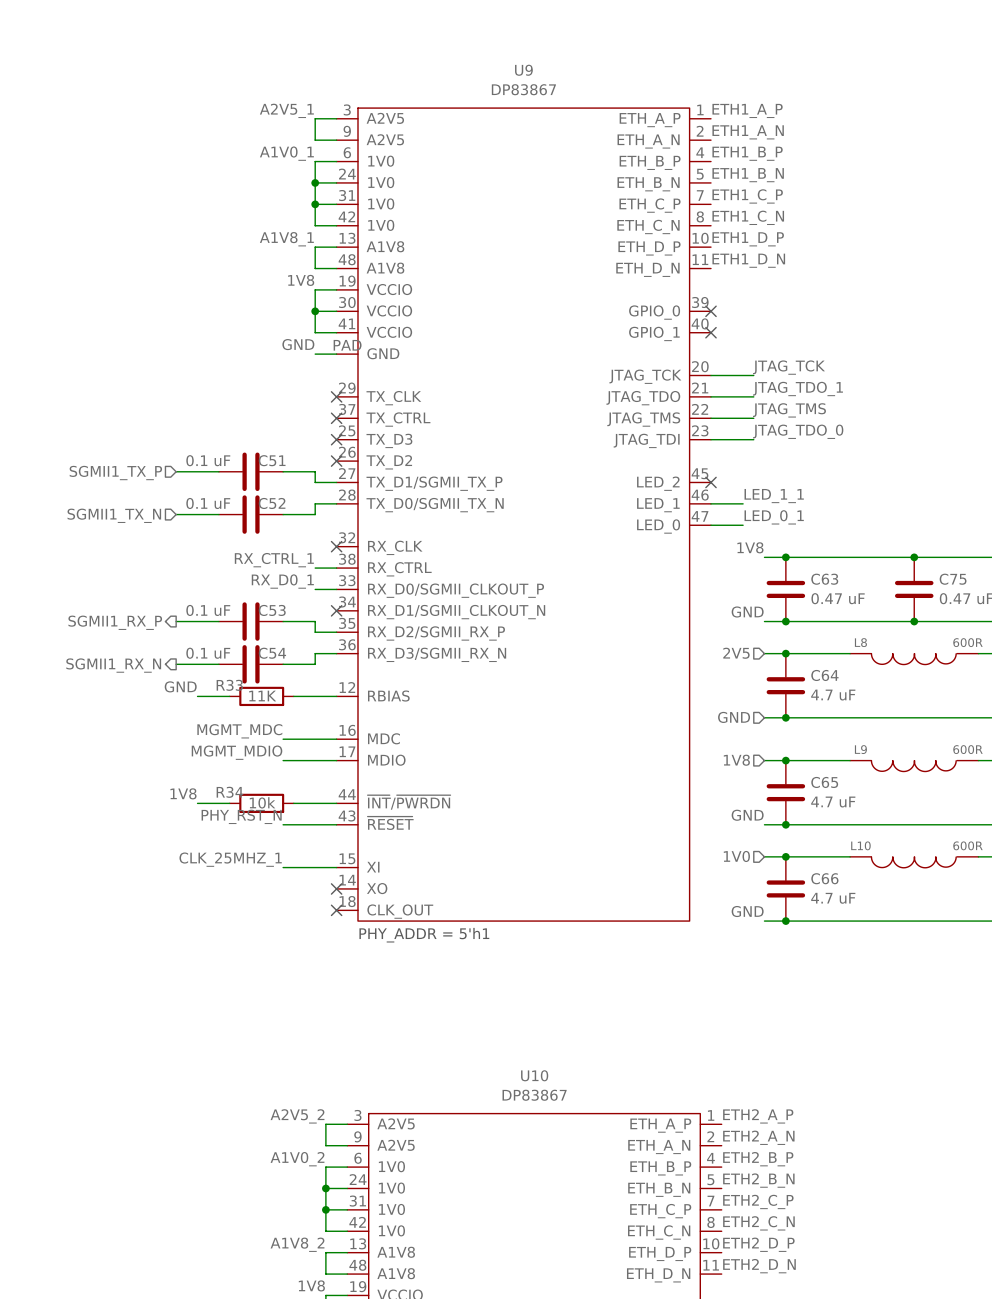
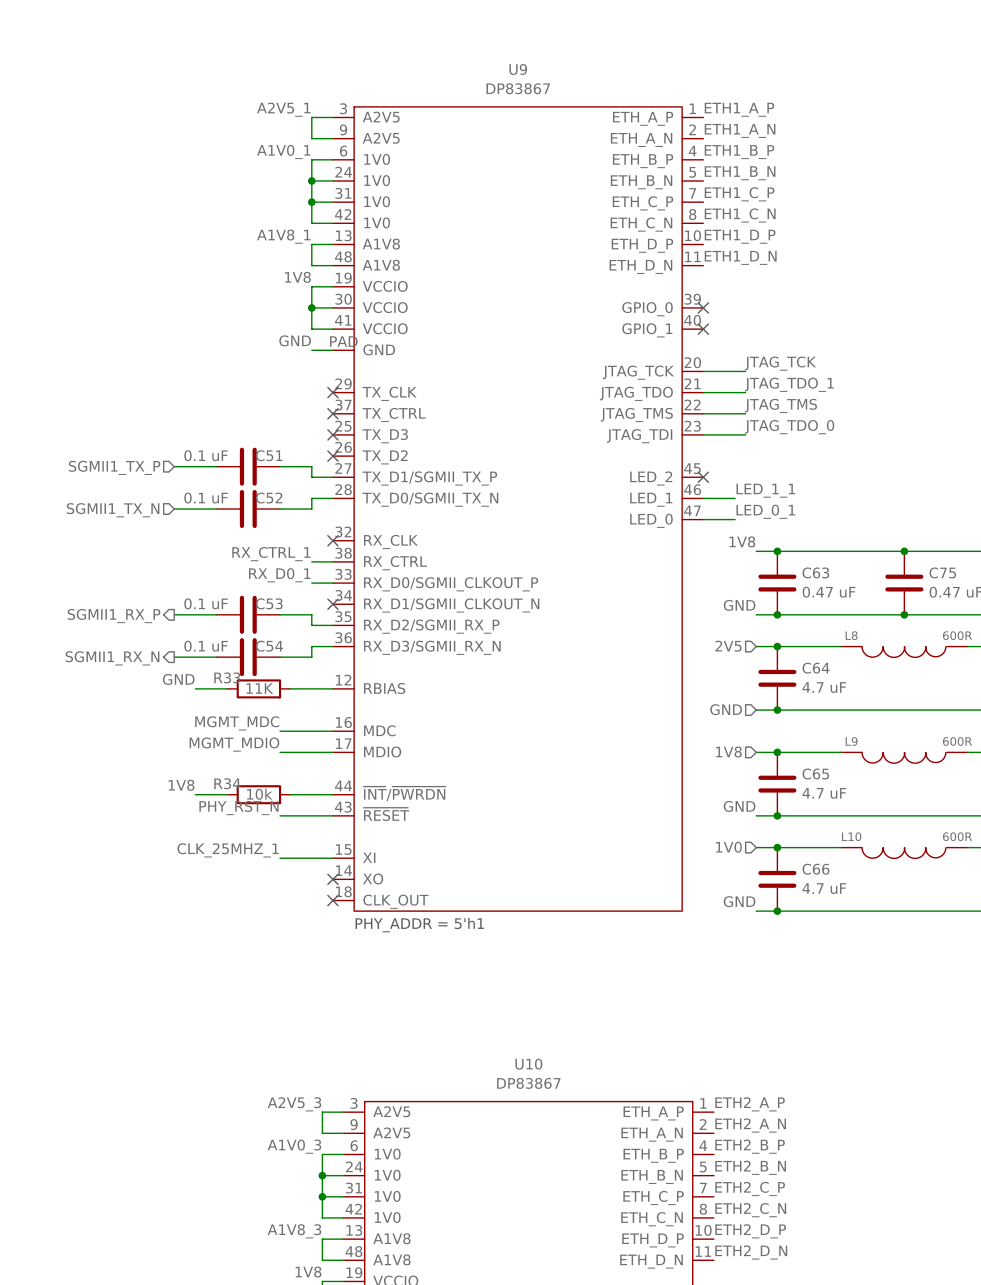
label: A2V5_2 (297, 1116) -> A2V5_3 (294, 1104)
label: A1V0_2 (297, 1159) -> A1V0_3 (294, 1146)
label: A1V8_2 (297, 1244) -> A1V8_3 (294, 1231)

